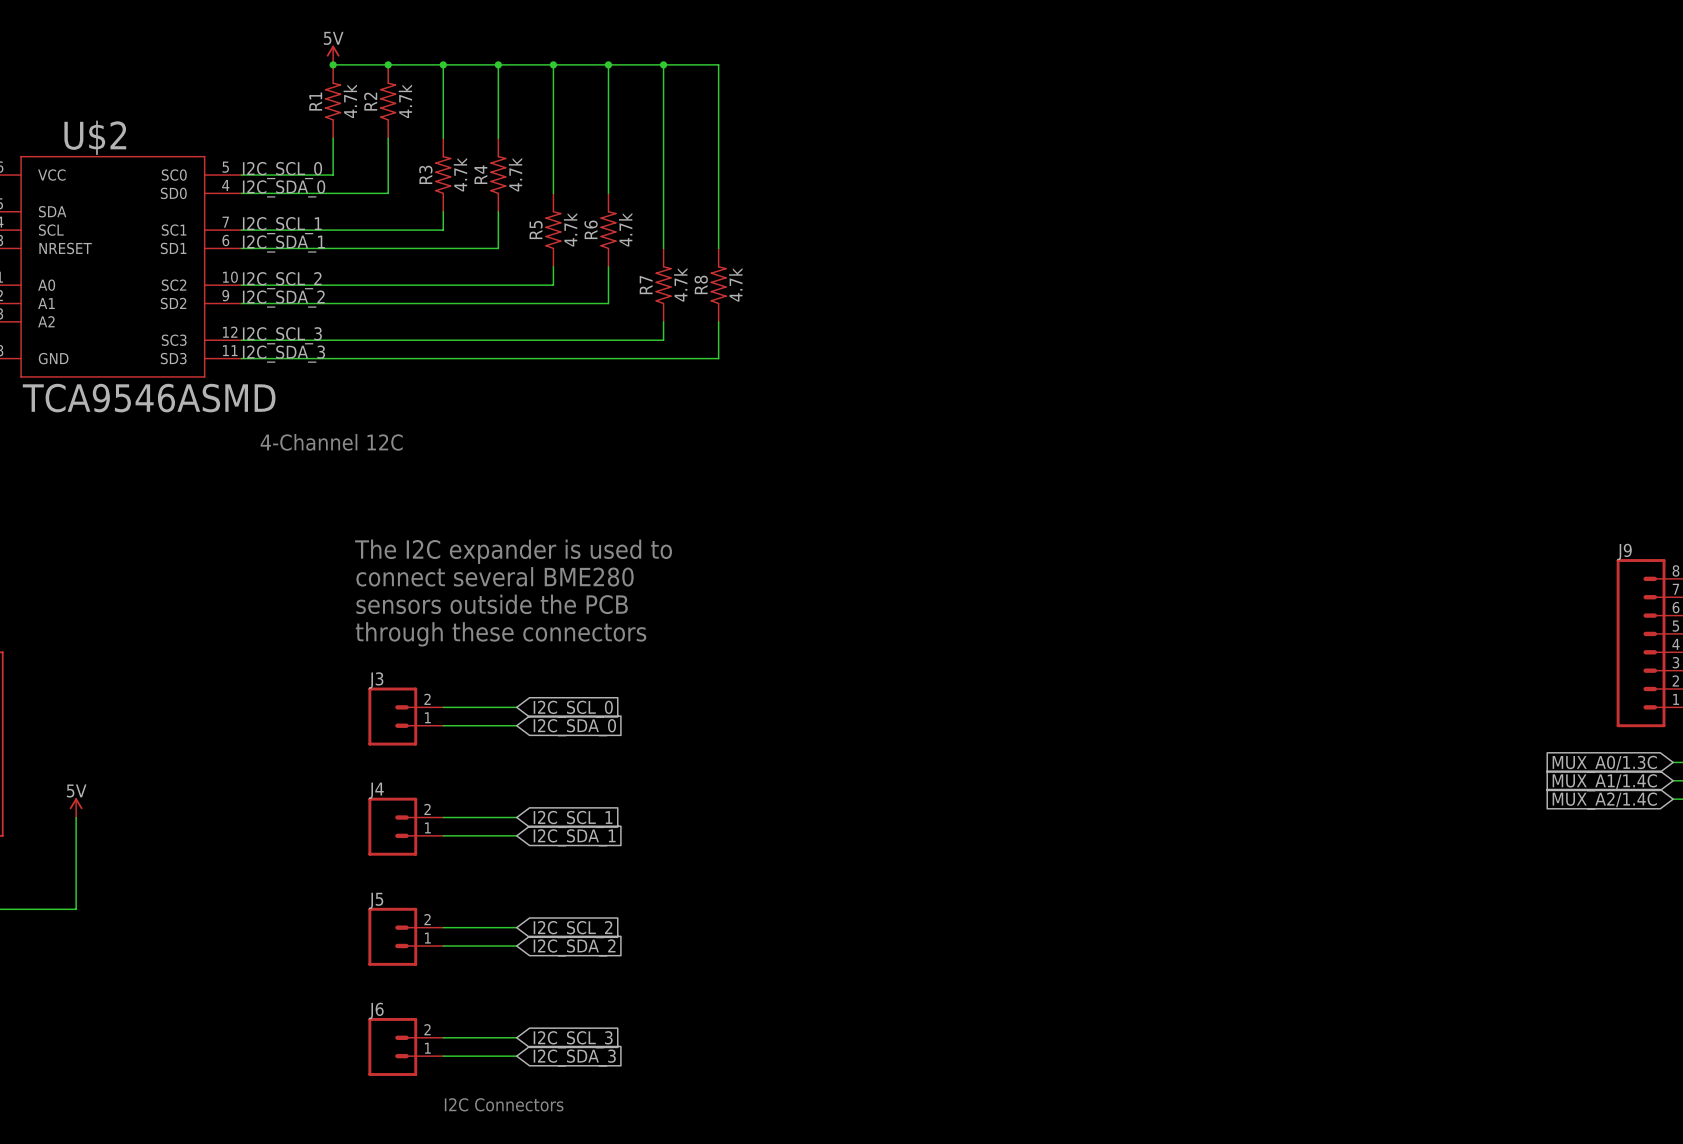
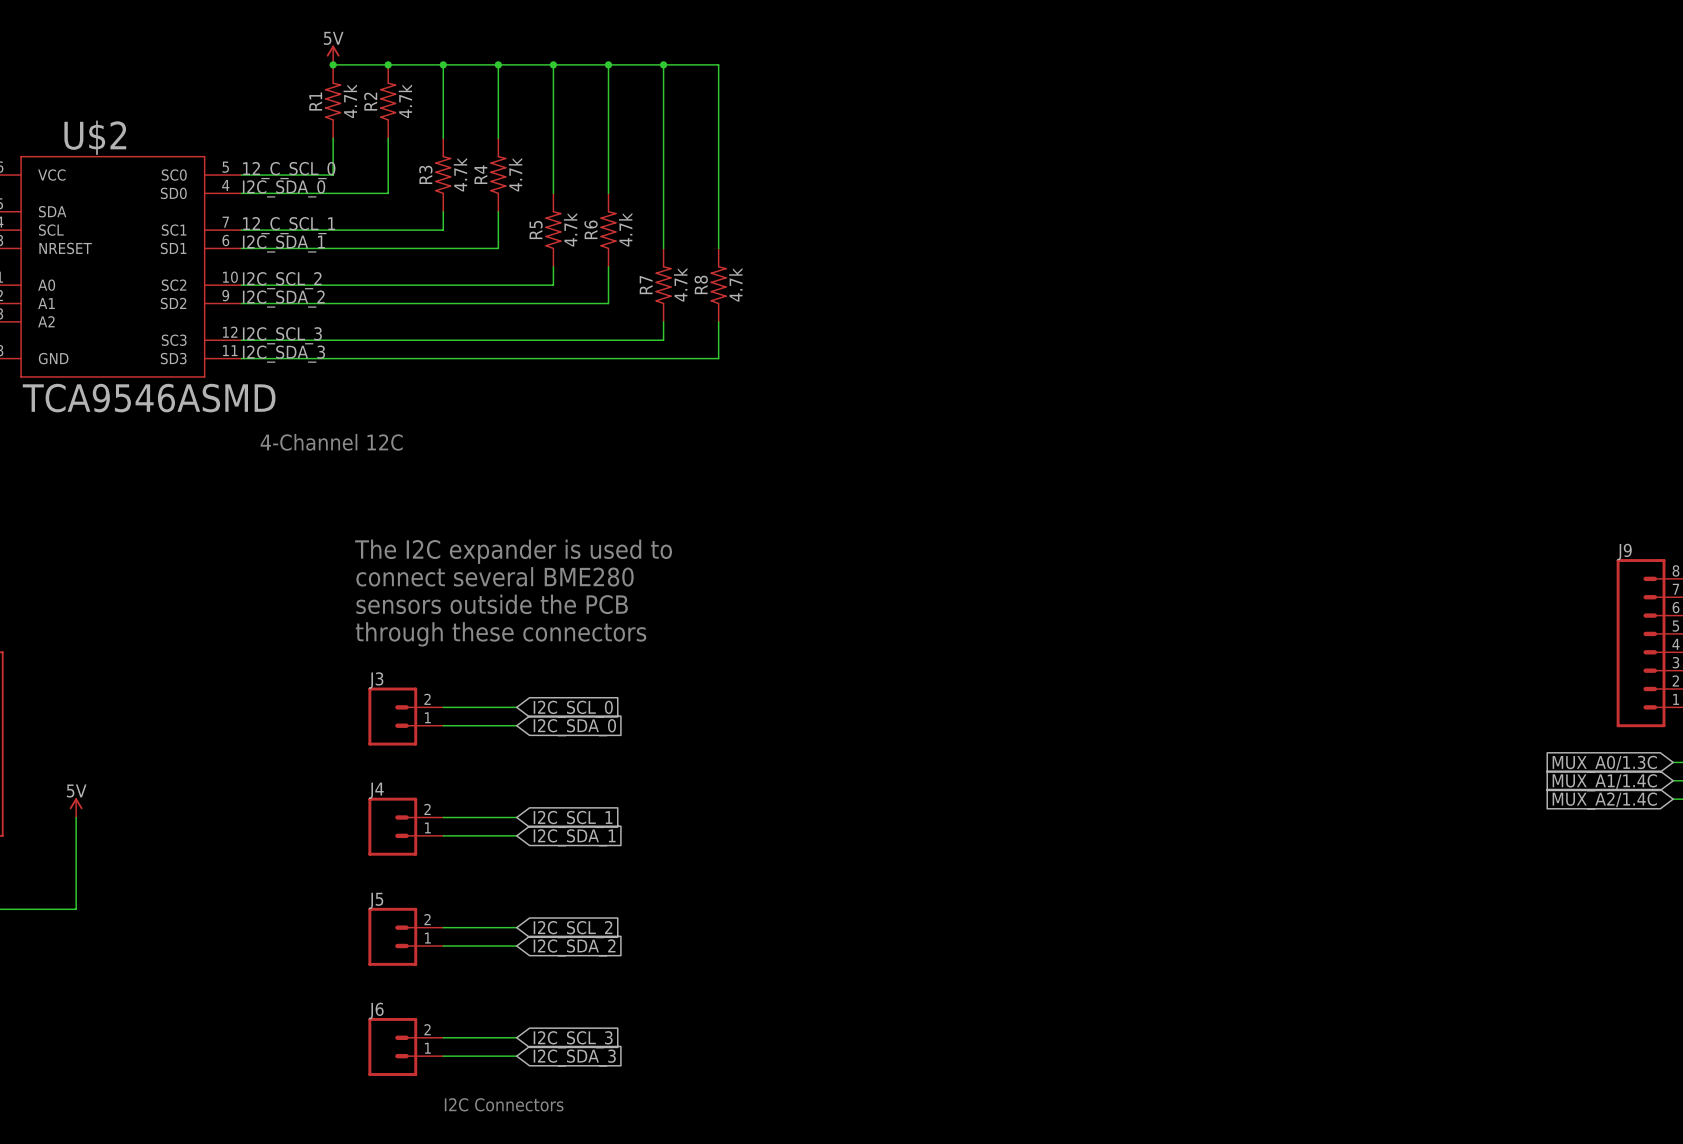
label: I2C_SCL_0 (282, 170) -> 12_C_SCL_0 (289, 170)
label: I2C_SCL_1 (282, 225) -> 12_C_SCL_1 (289, 225)

